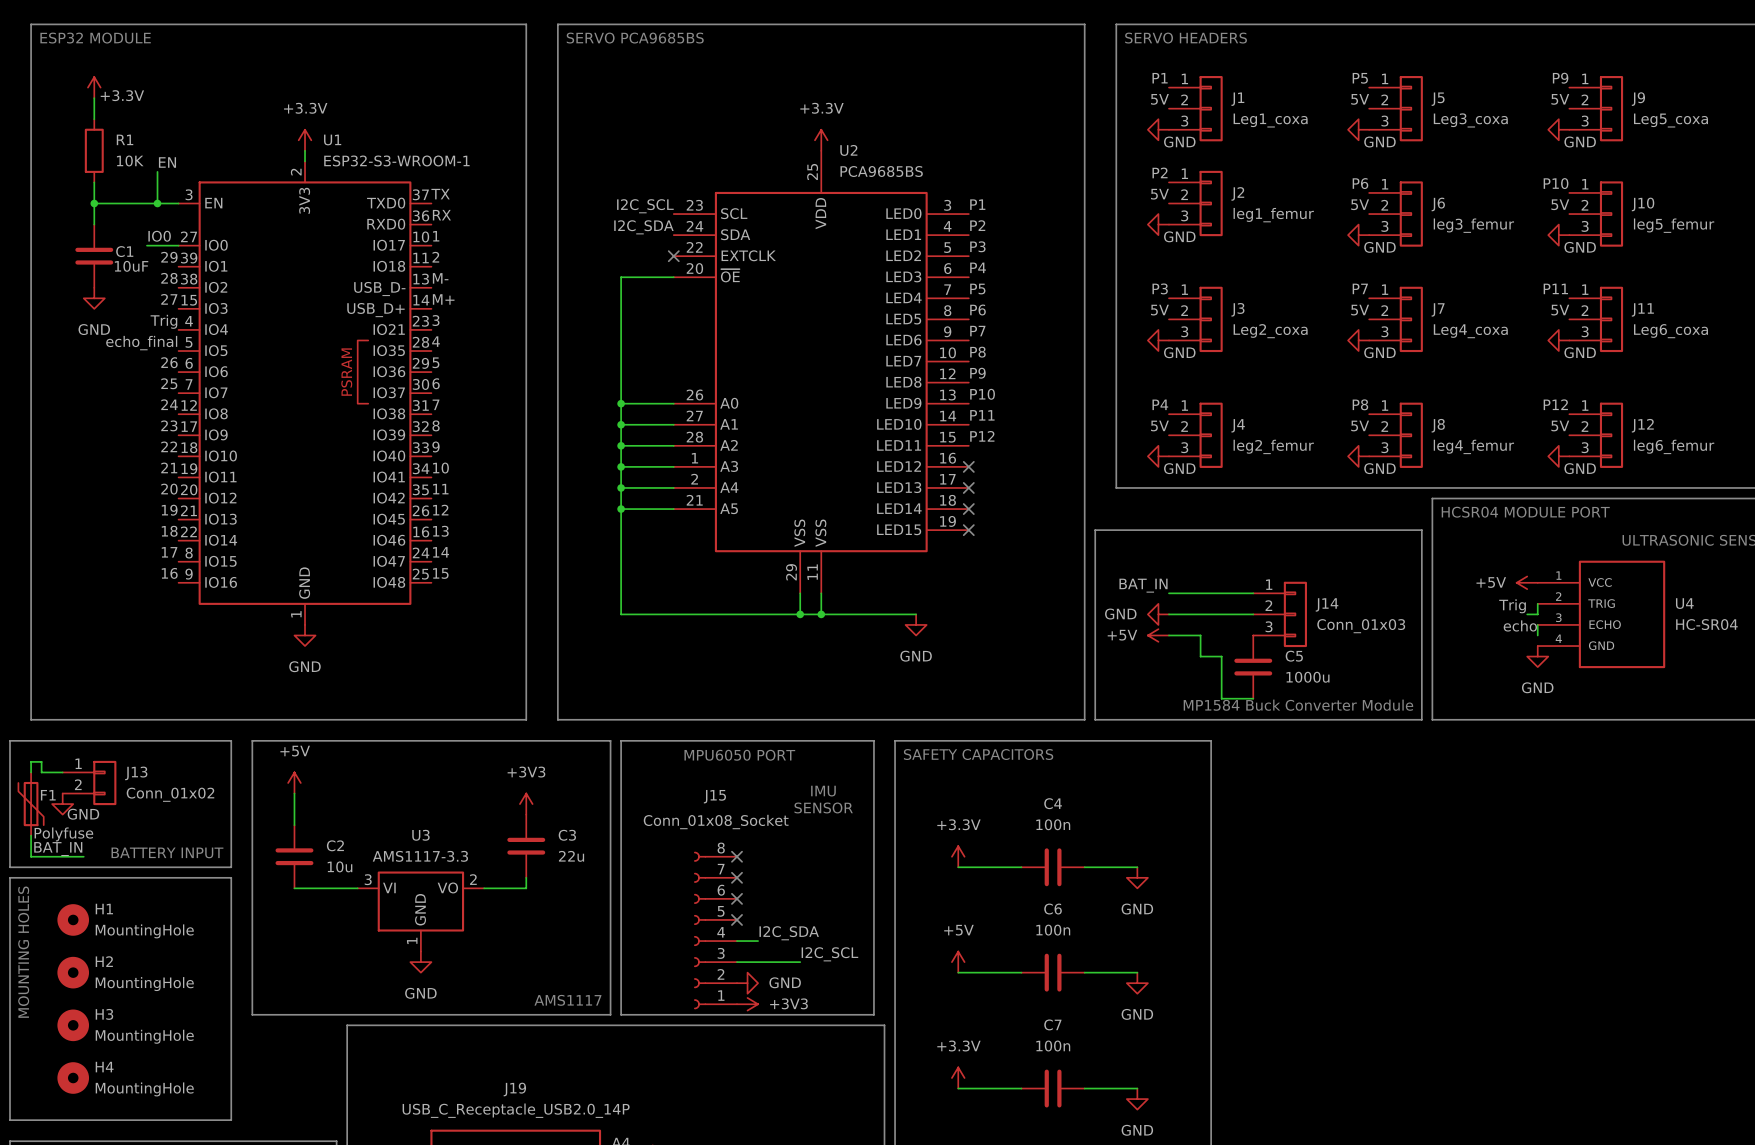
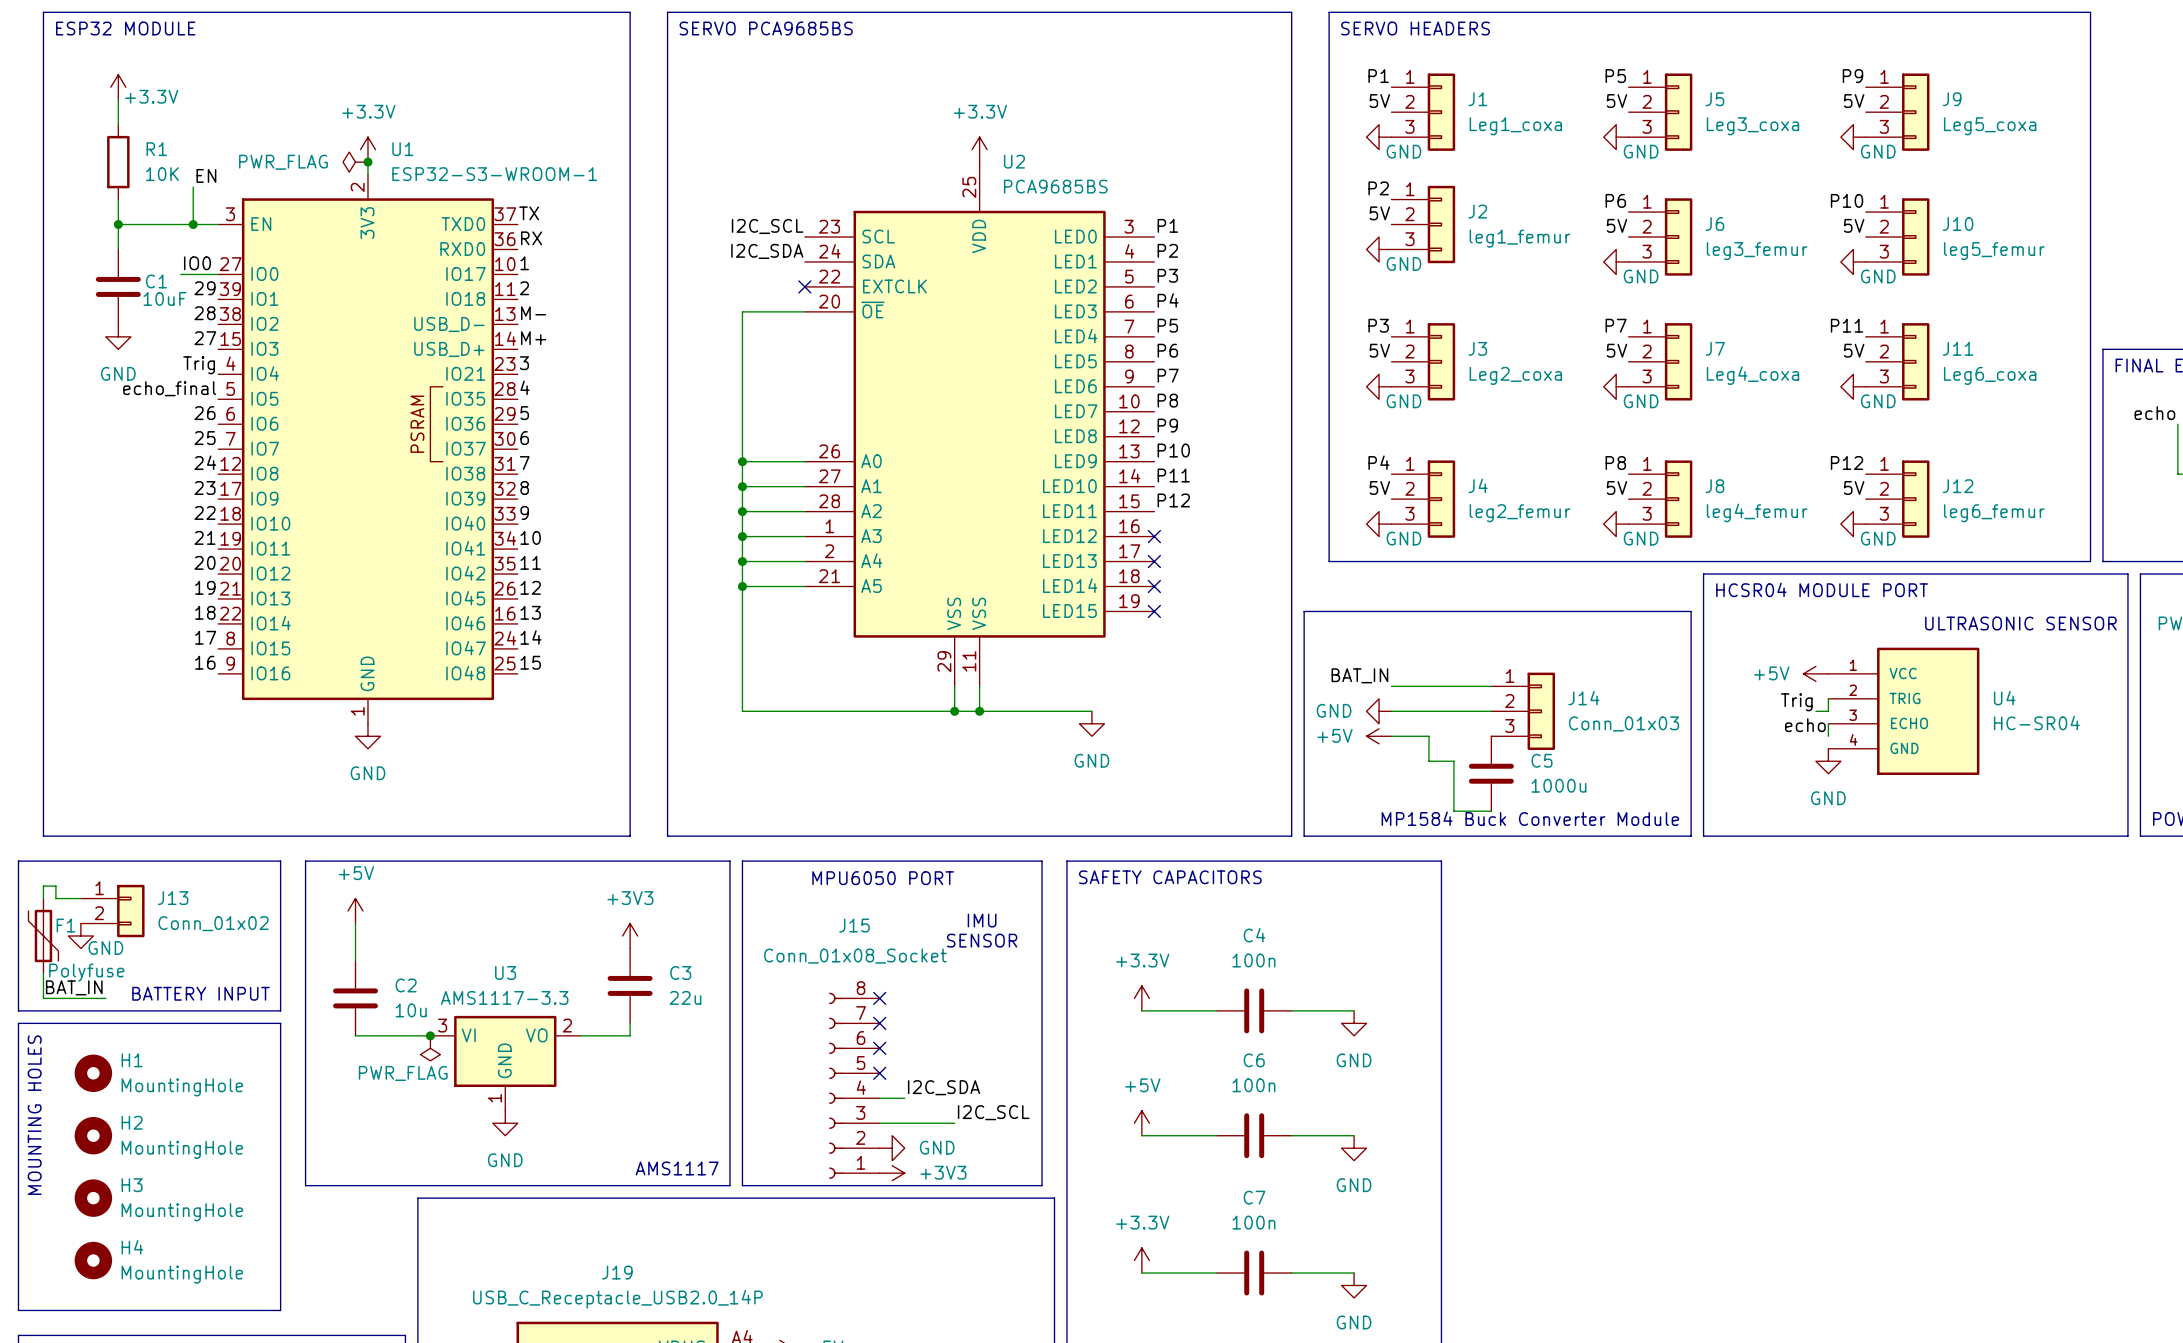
power symbol: none -> PWR_FLAG (355, 162)
junction: none -> (367, 162)
junction: none -> (430, 1035)
power symbol: none -> PWR_FLAG (430, 1048)

